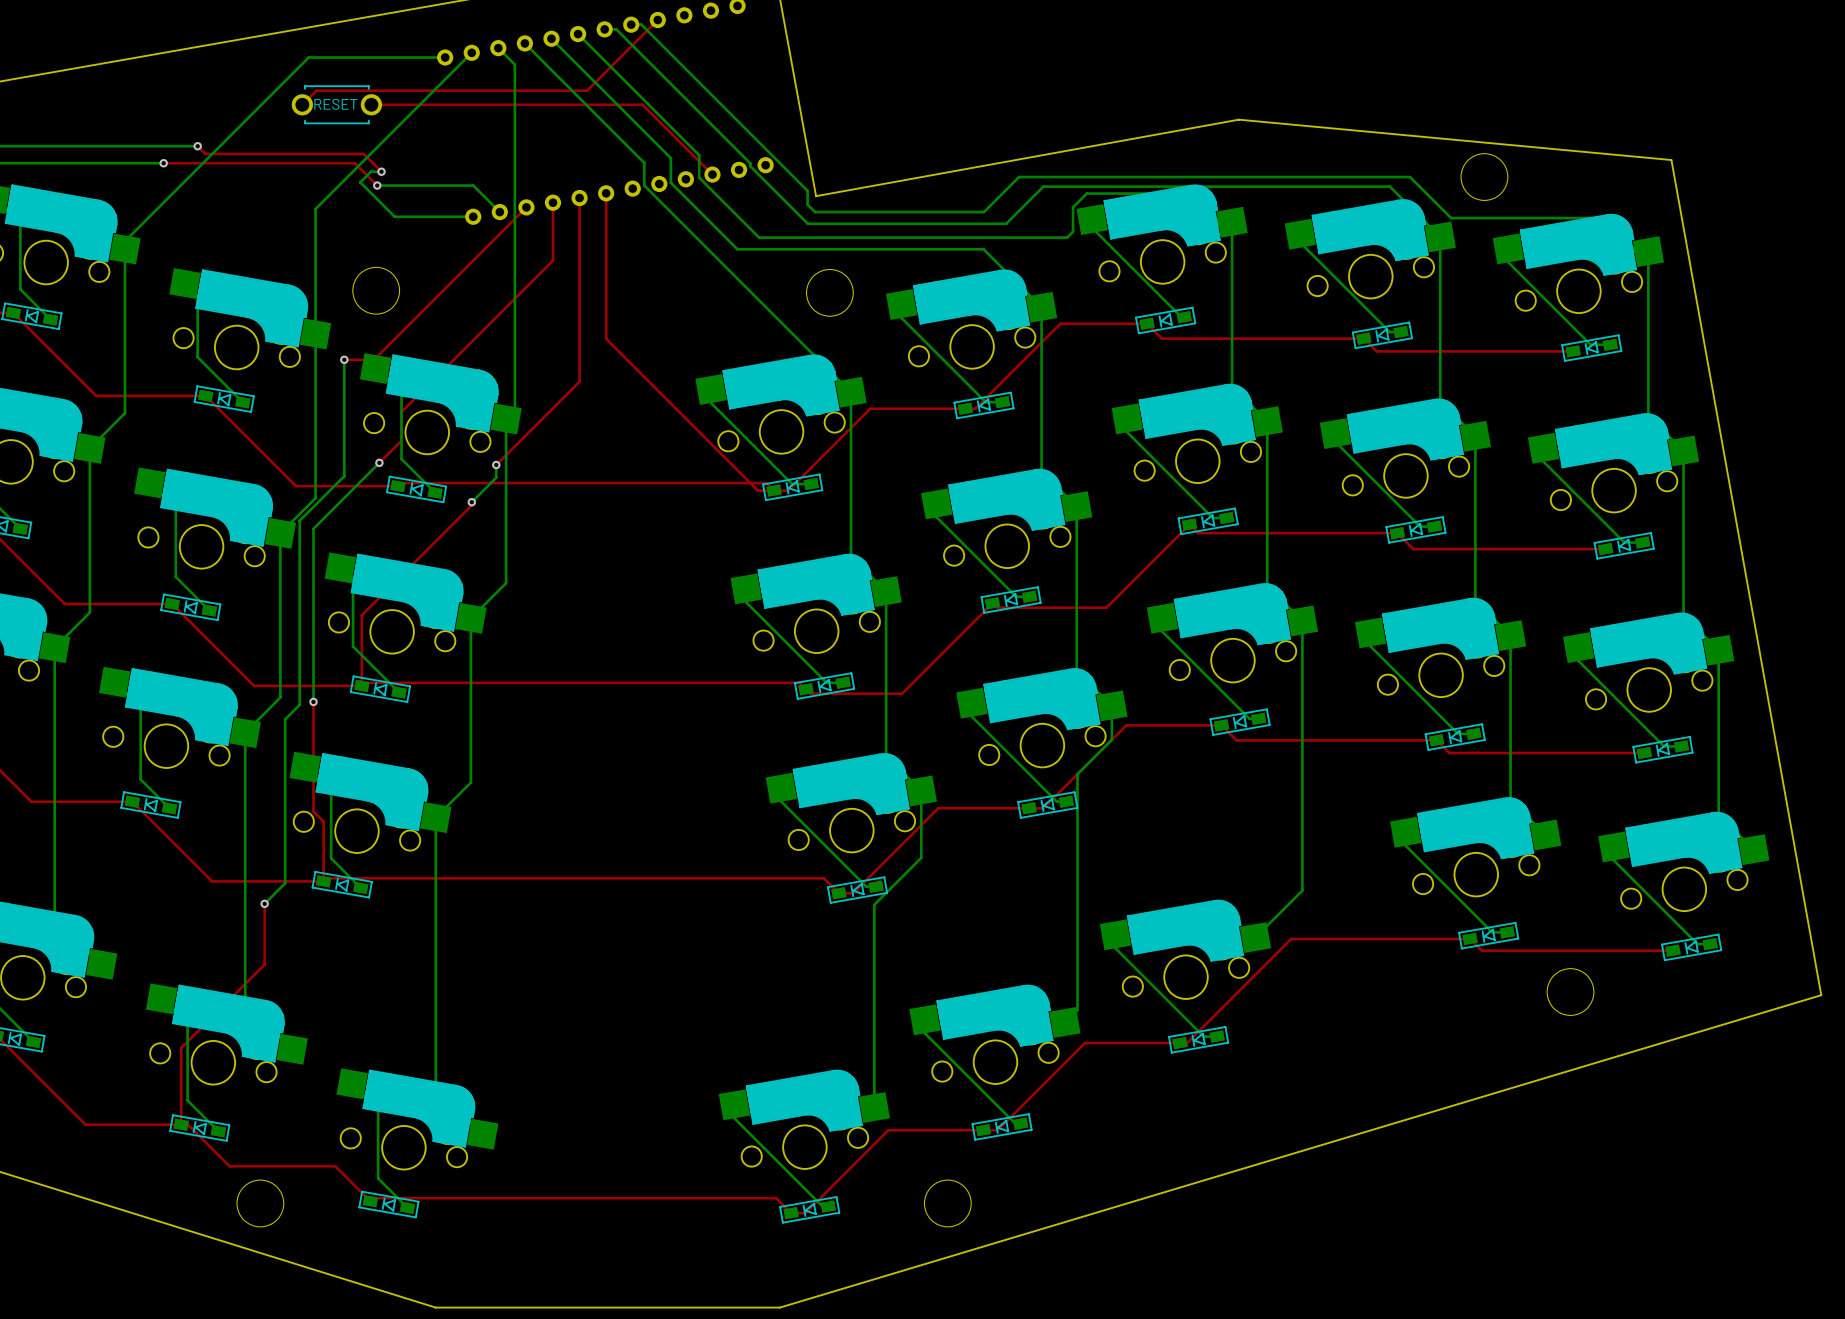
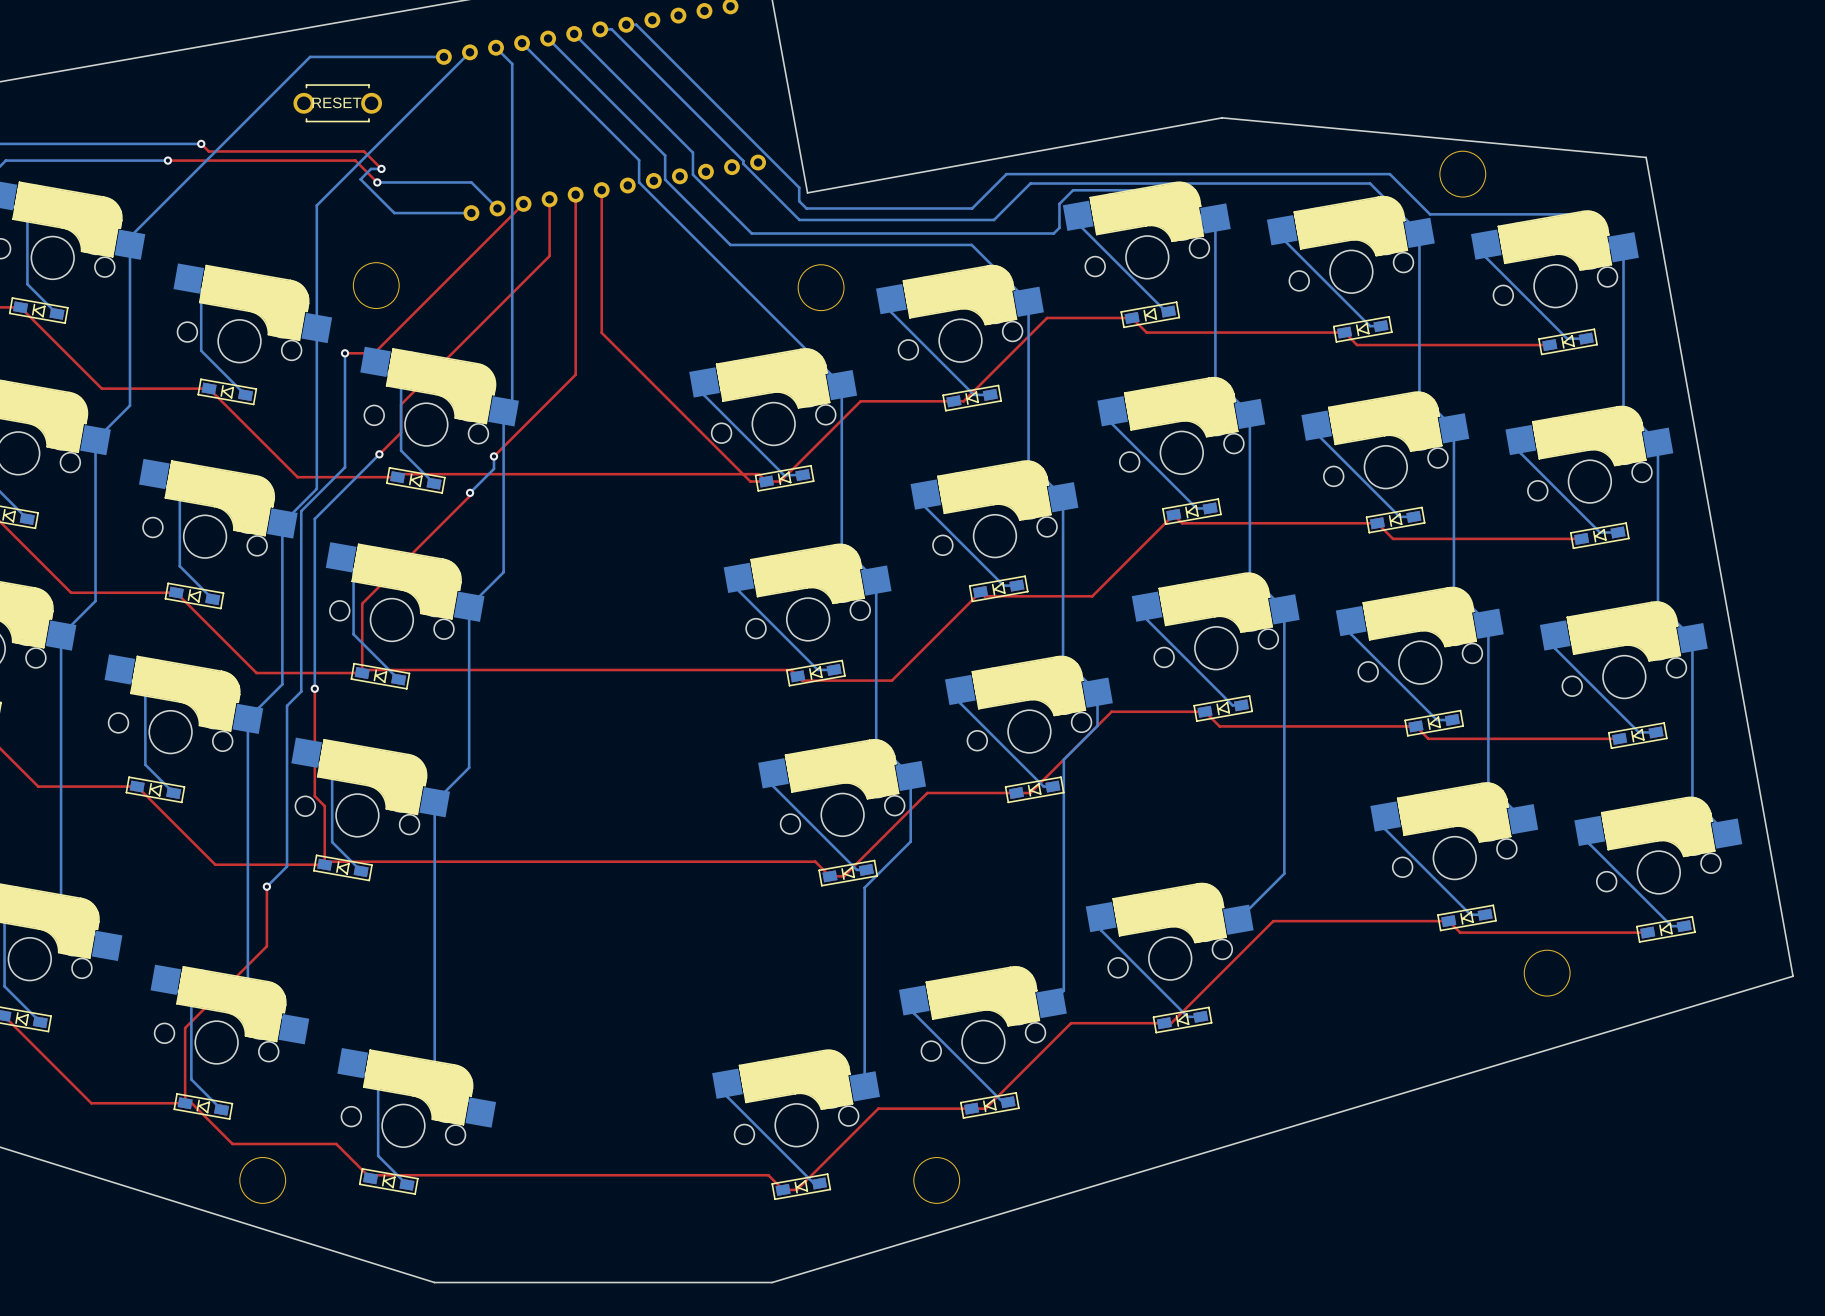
top track: (657, 20) (587, 90) (316, 90) (302, 104) -> none
top track: (371, 104) (642, 104) (712, 174) -> none

